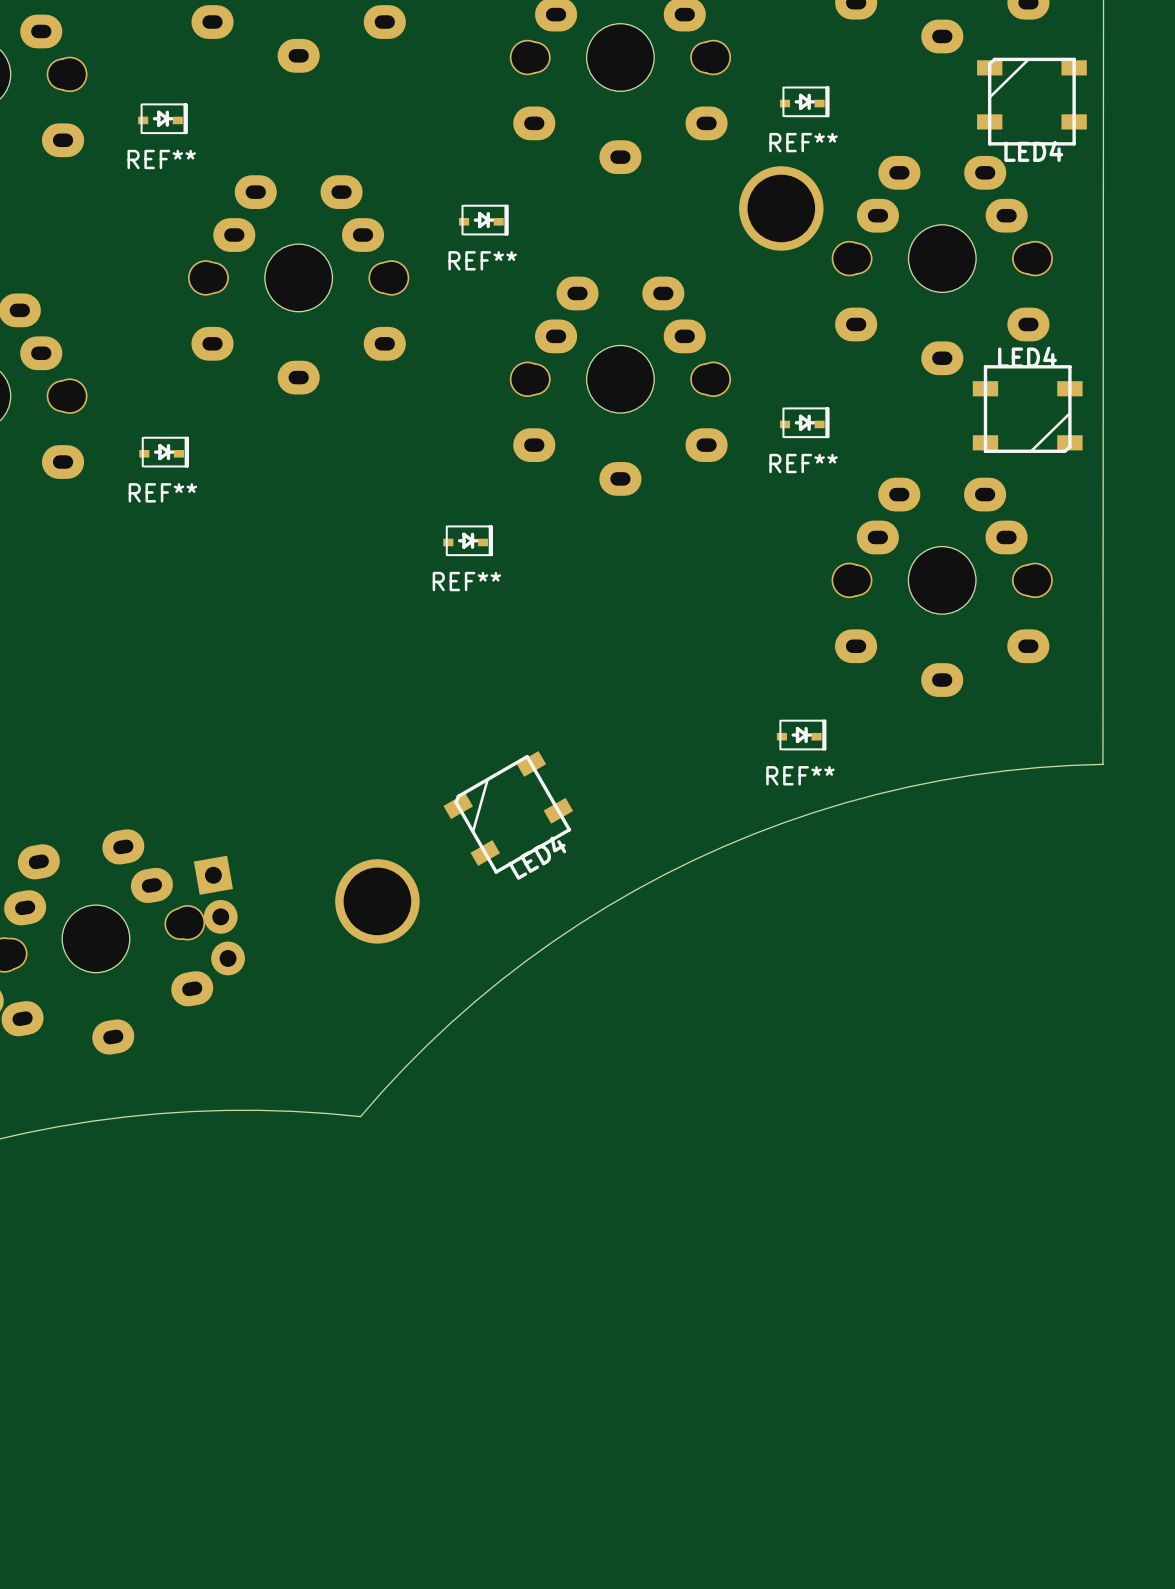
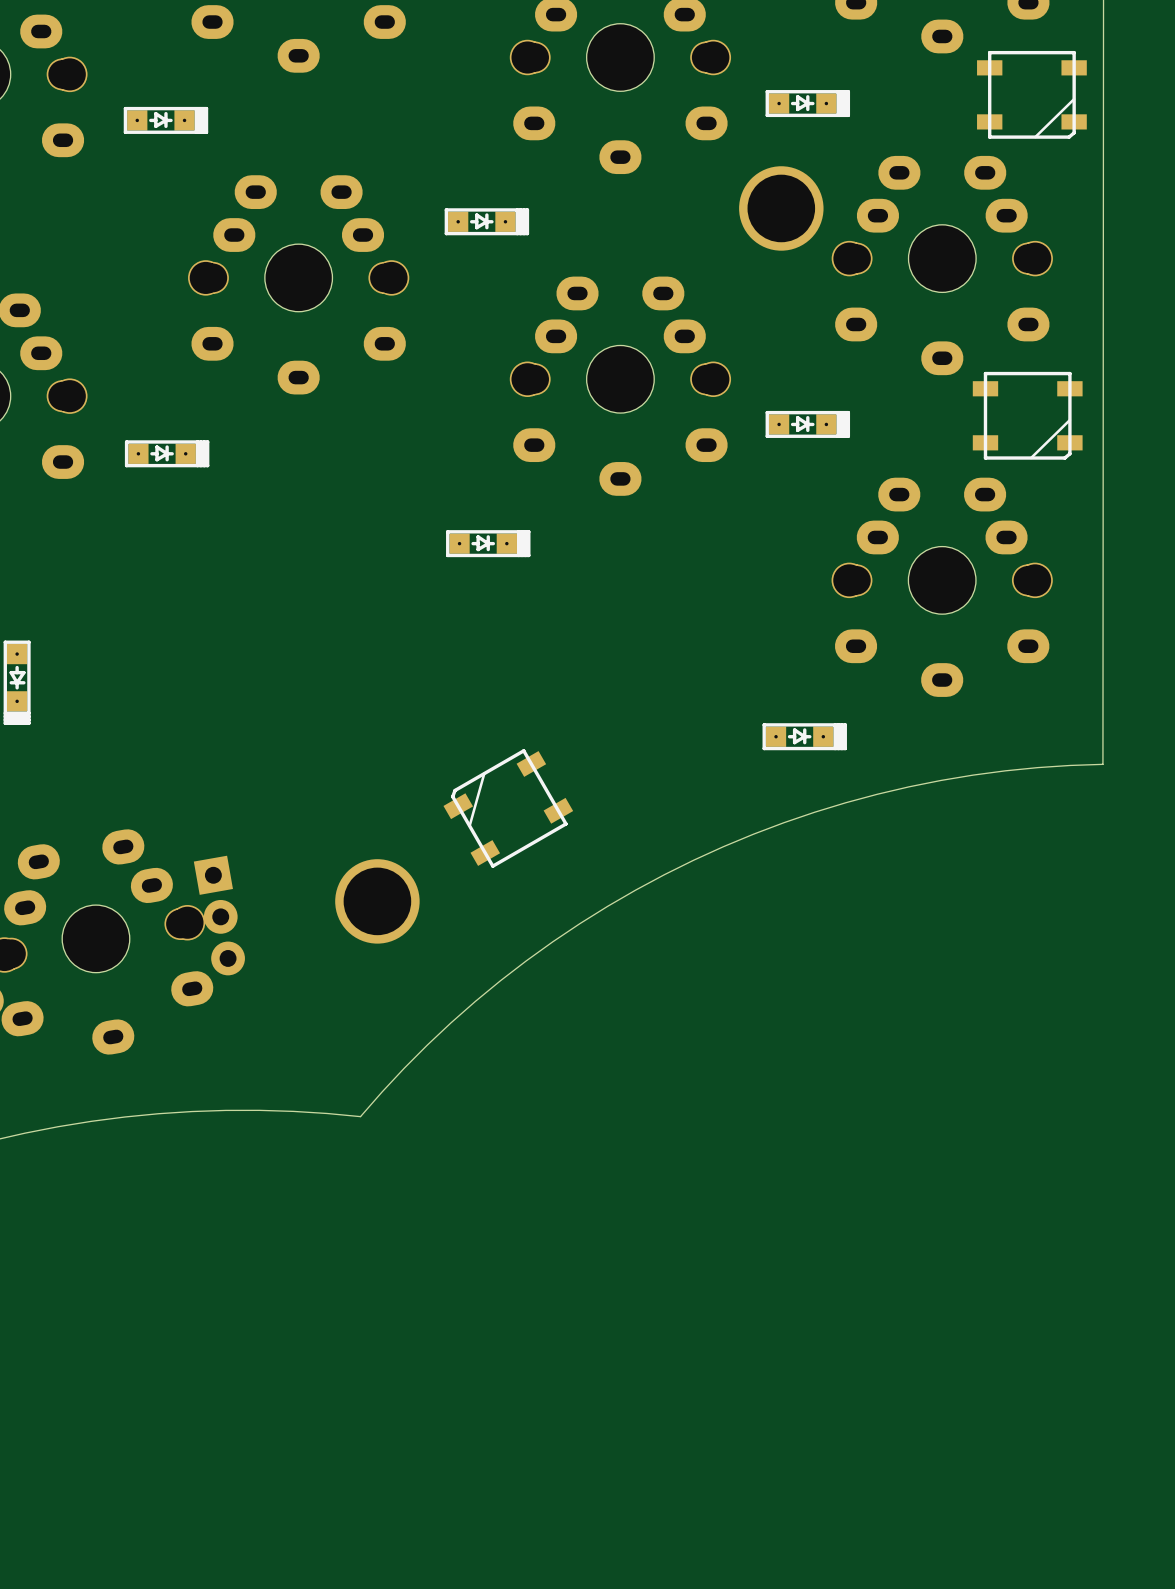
part footprint: [977, 57, 1087, 146] -> [977, 50, 1087, 139]
part footprint: [779, 86, 830, 118] -> [765, 90, 851, 118]
part footprint: [138, 103, 188, 135] -> [123, 106, 209, 134]
part footprint: [459, 204, 509, 236] -> [444, 208, 530, 236]
part footprint: [972, 365, 1083, 453] -> [972, 371, 1083, 460]
part footprint: [779, 407, 830, 439] -> [765, 410, 851, 438]
part footprint: [139, 436, 189, 468] -> [124, 440, 210, 468]
part: (468, 540) -> none
part: none -> (488, 543)
part: none -> (17, 682)
part footprint: [776, 719, 827, 751] -> [762, 723, 847, 751]
part footprint: [443, 751, 574, 874] -> [443, 749, 574, 868]

